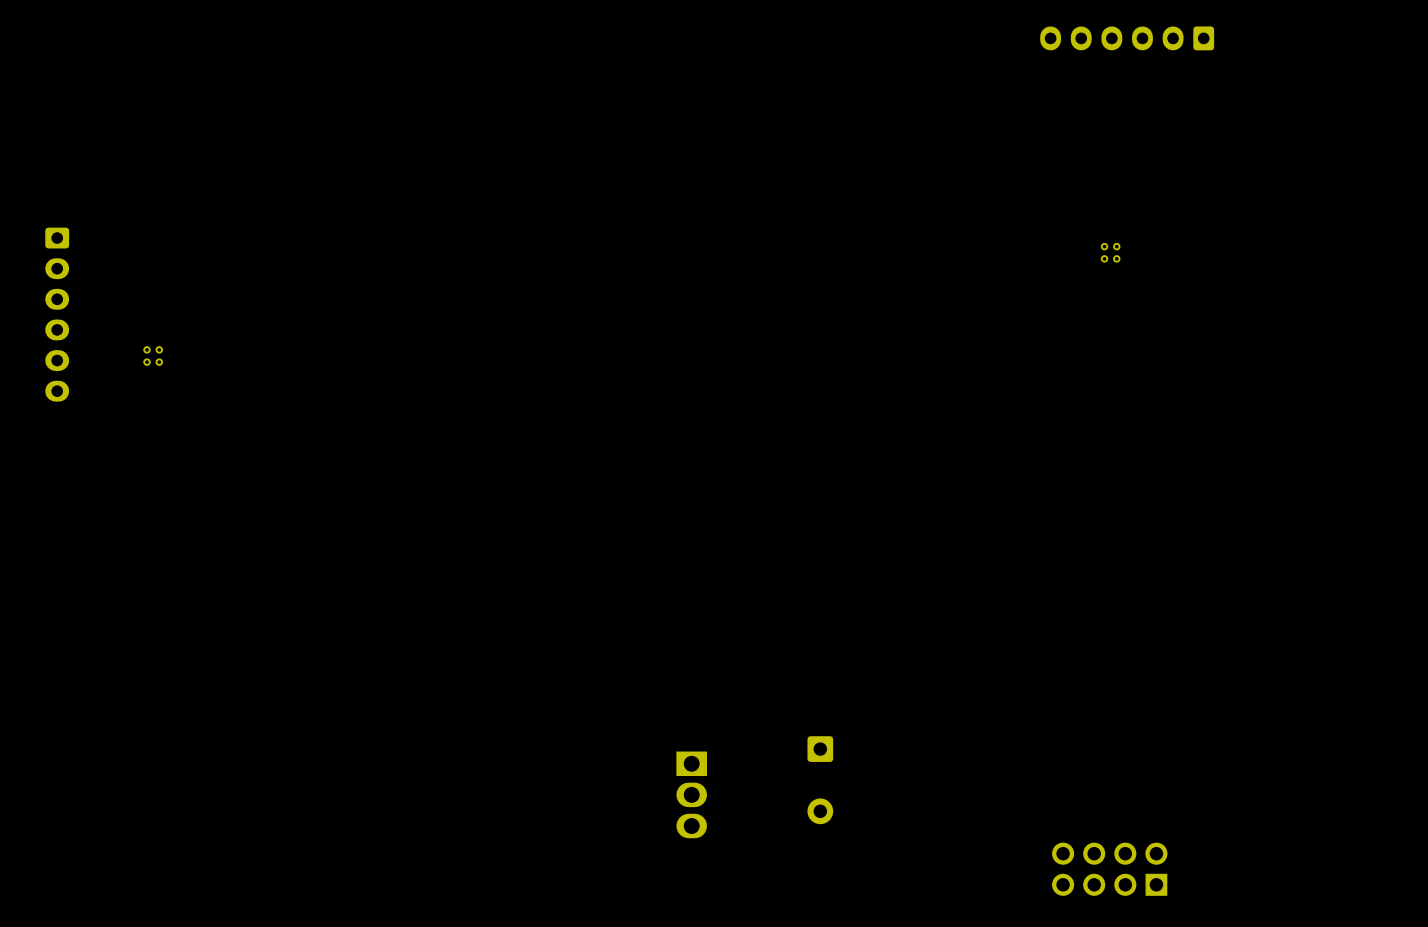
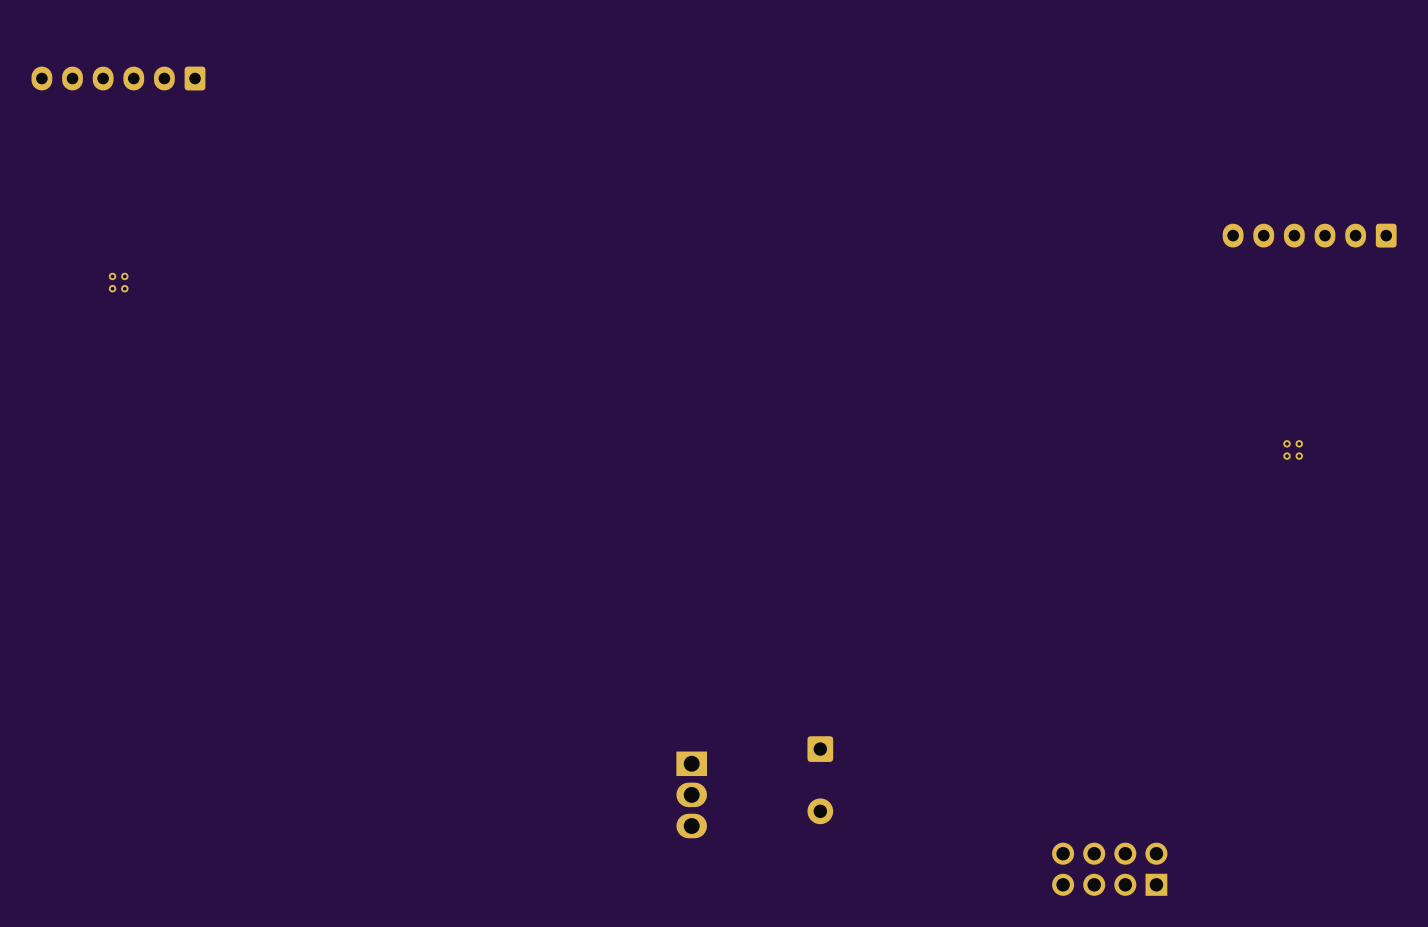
part position: (1127, 38) -> (1309, 235)
part position: (1110, 252) -> (1293, 449)
part rotation: 0° (57, 314) -> 90° clockwise (118, 78)
part position: (57, 314) -> (118, 78)
part position: (153, 356) -> (118, 282)

